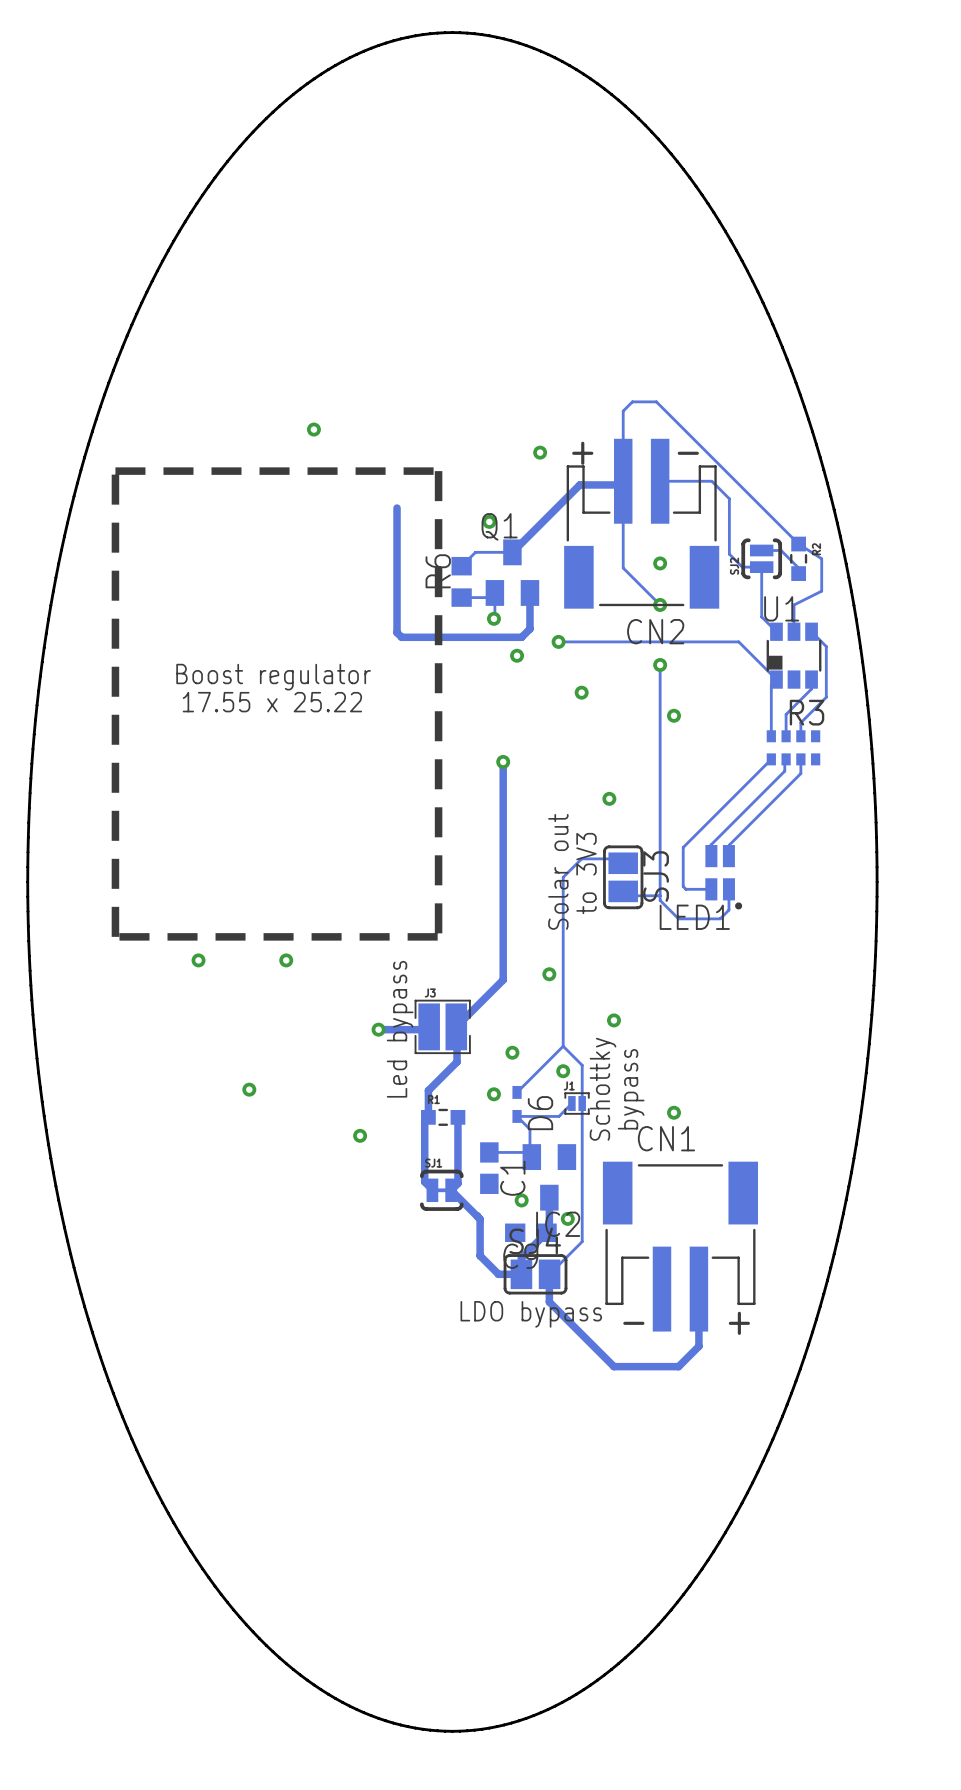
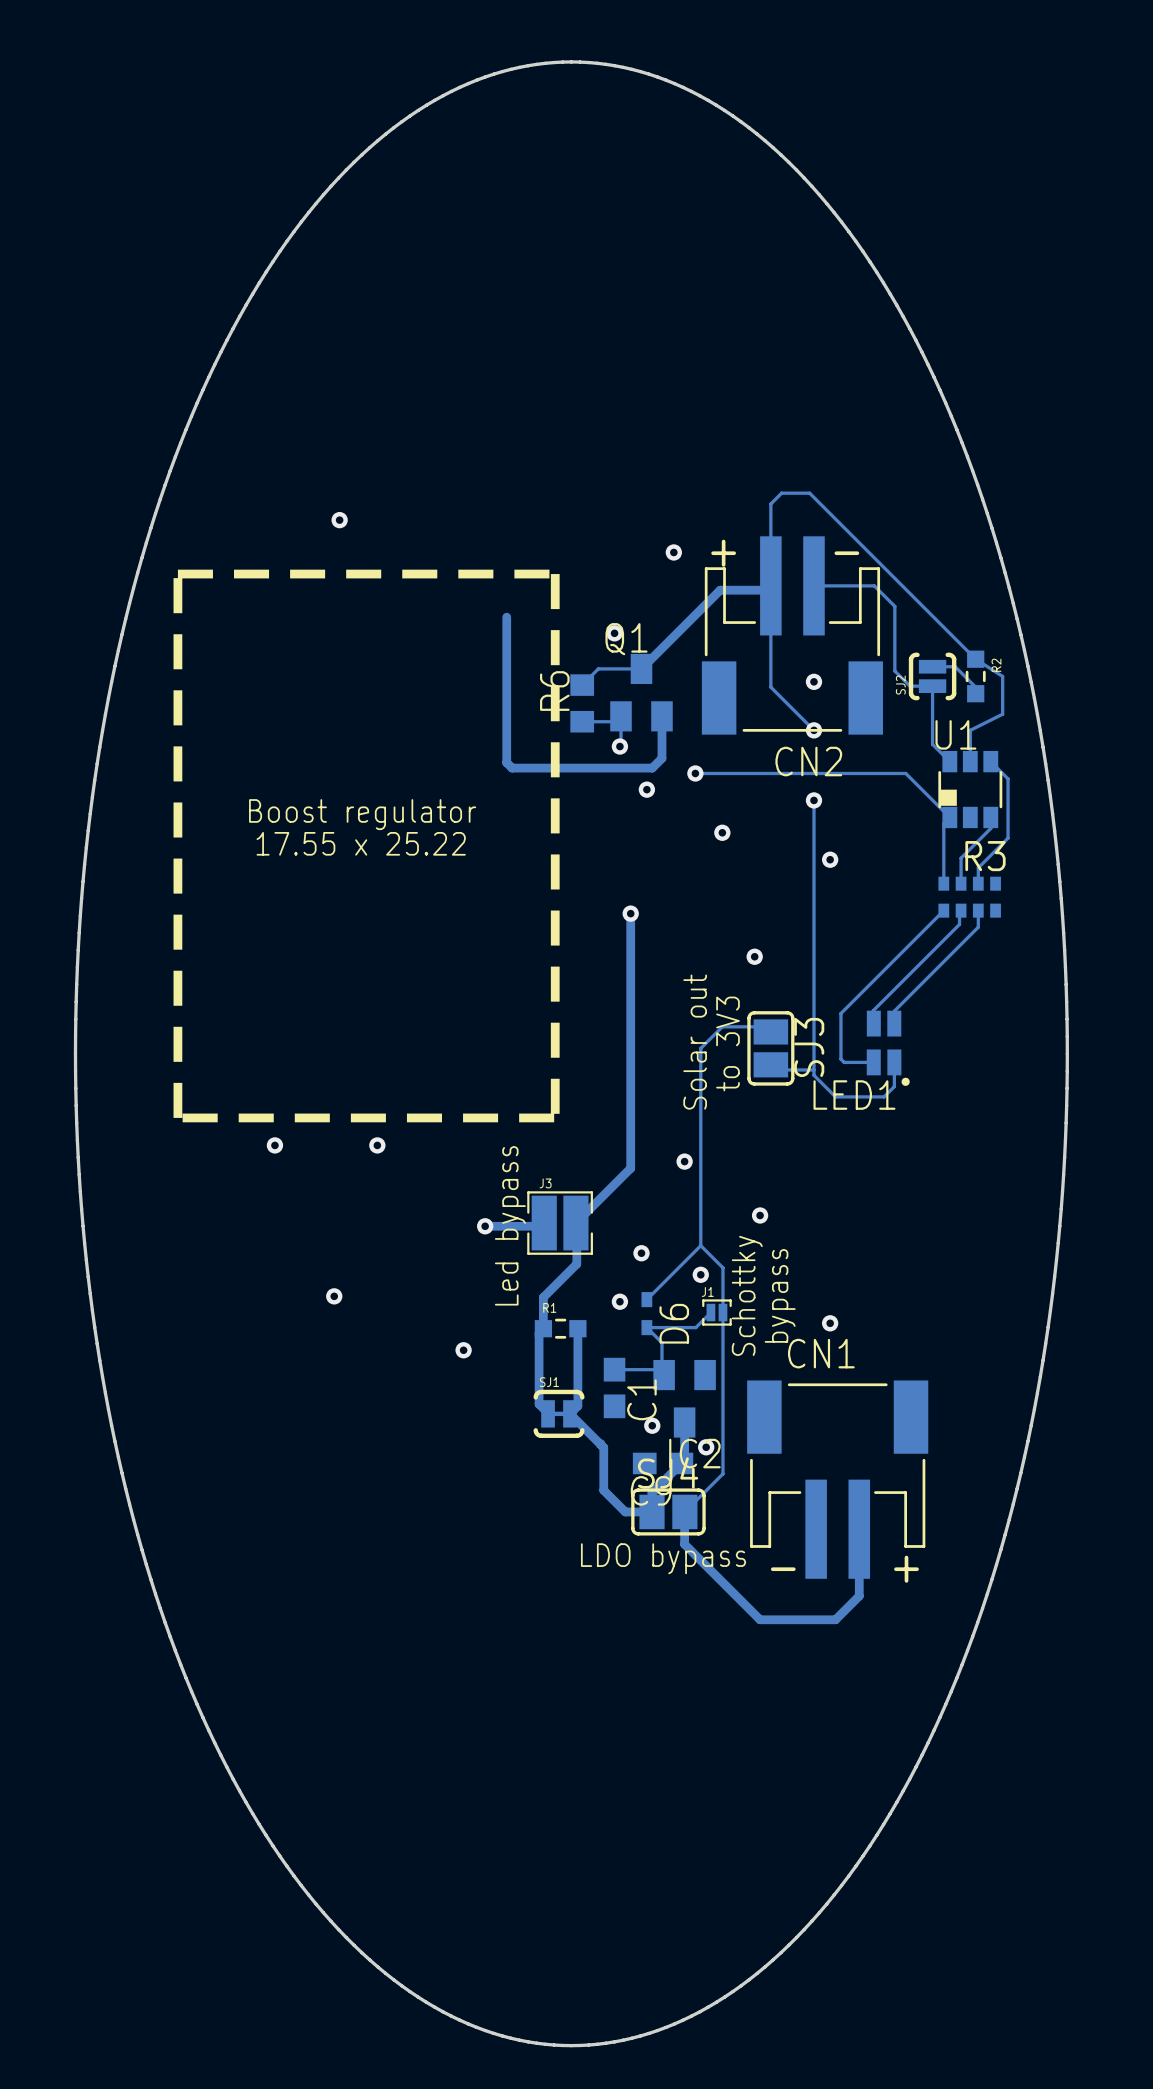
via position: (313, 429) -> (339, 520)

